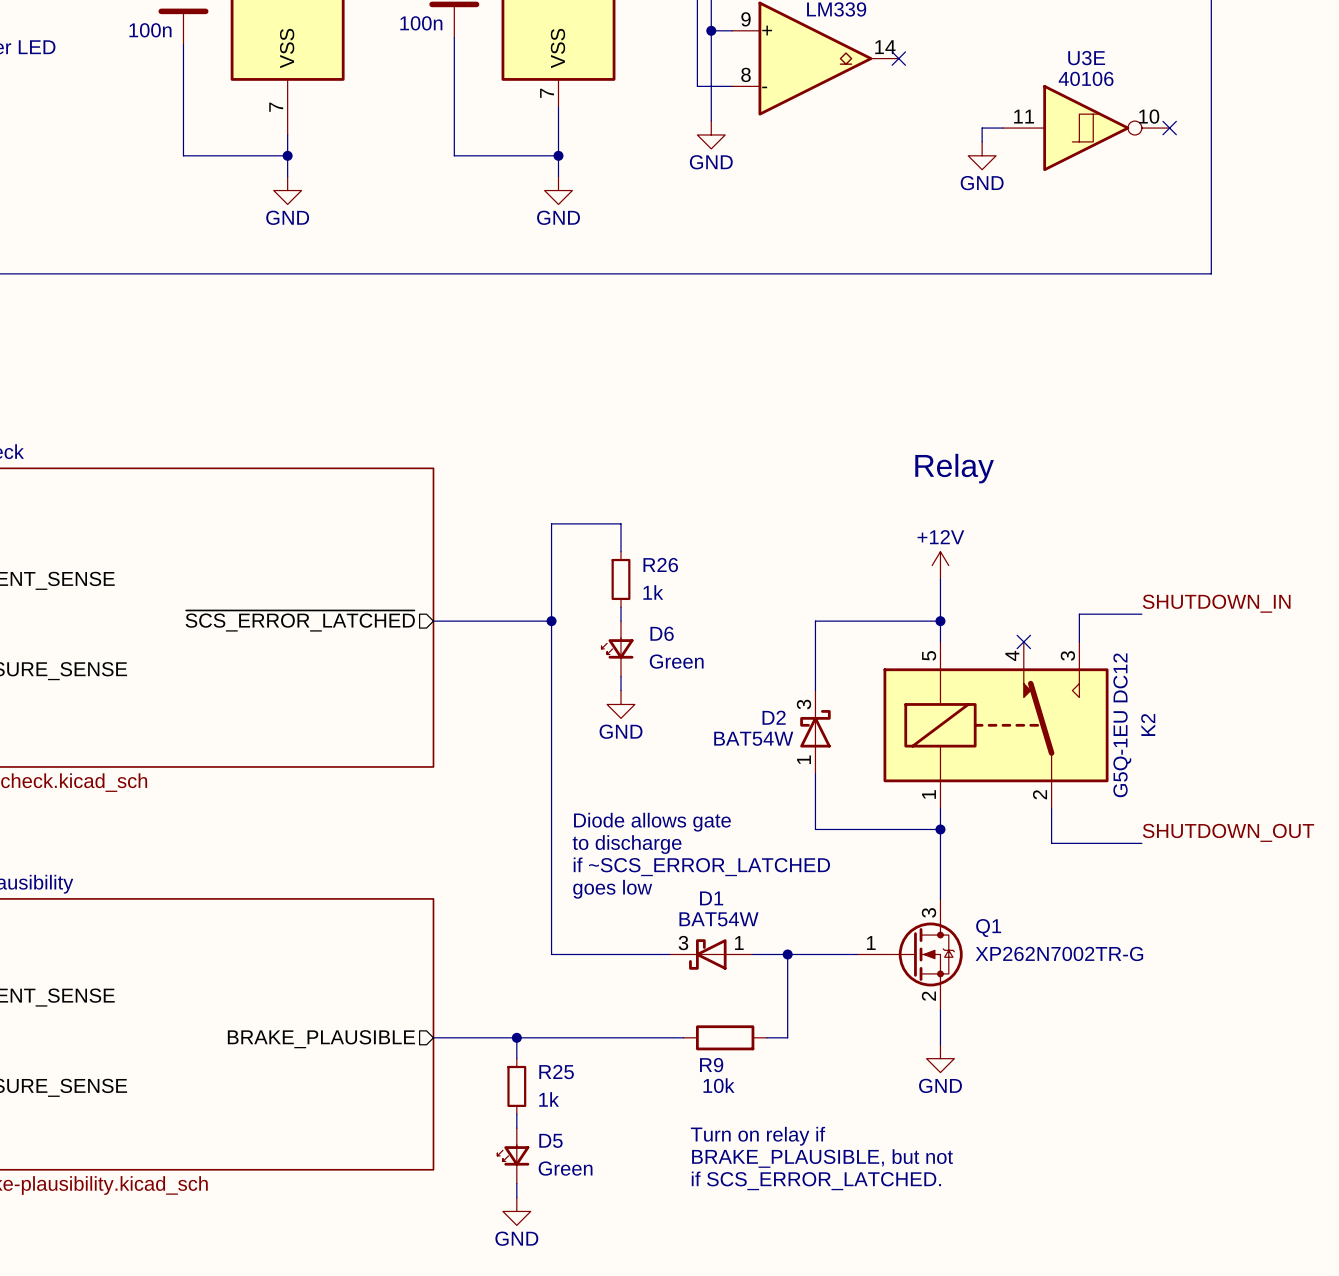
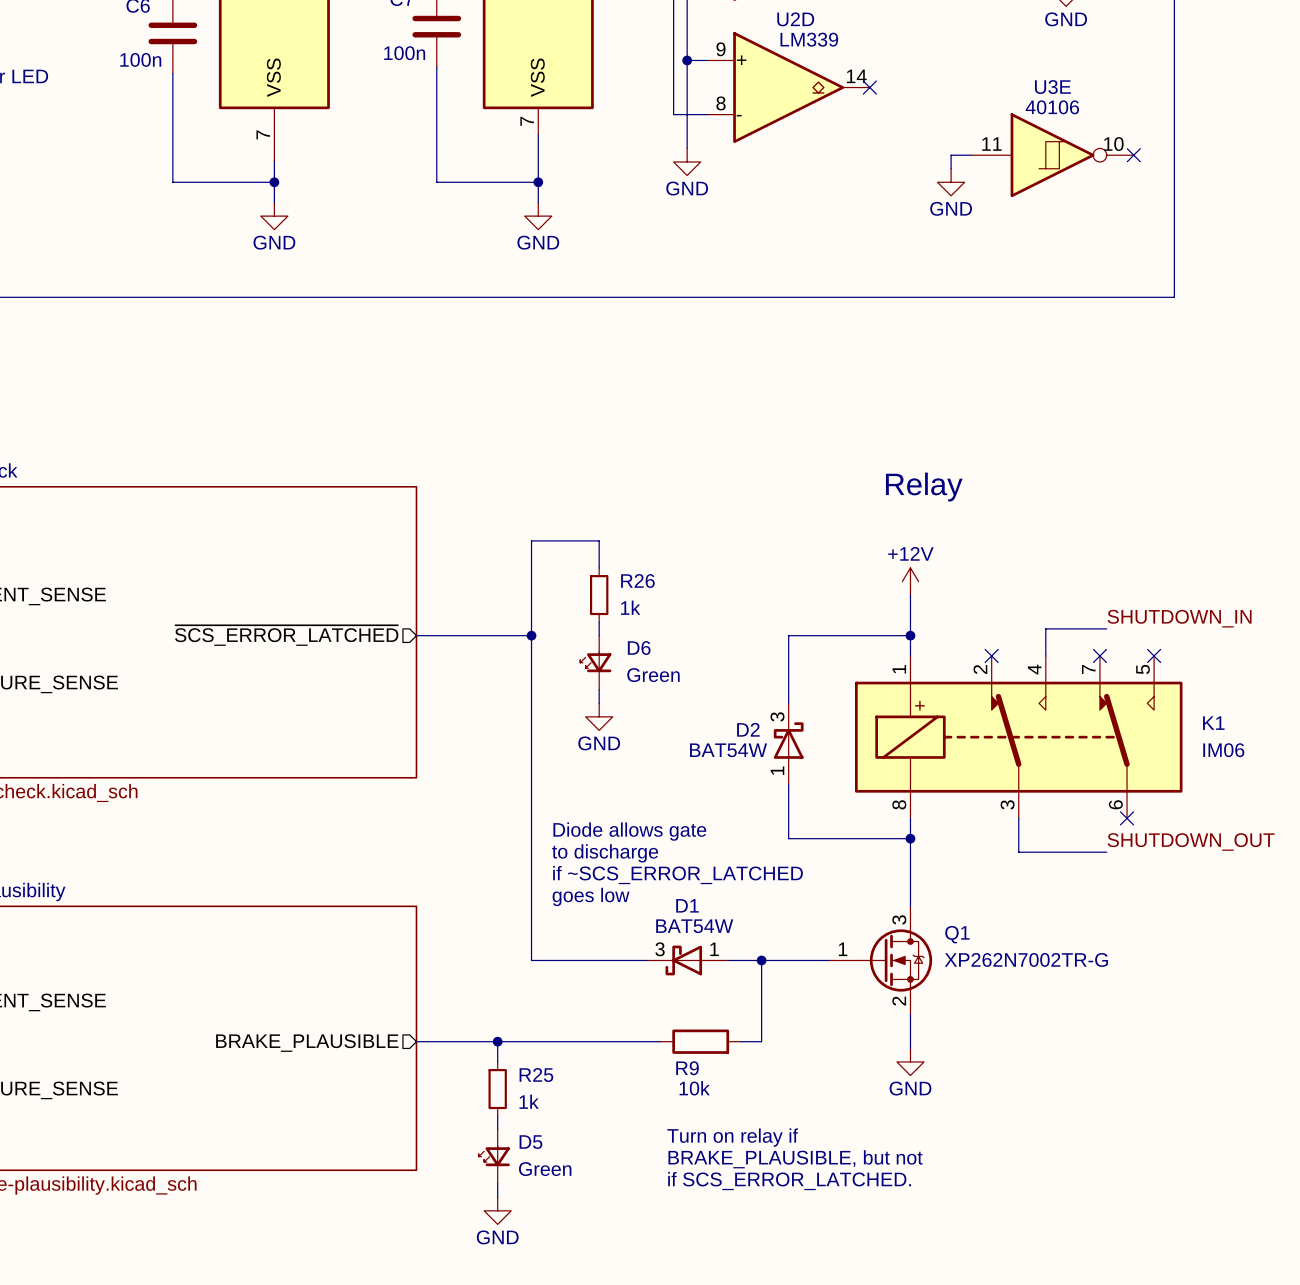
no-connect mark: none -> (1099, 655)
no-connect mark: none -> (1154, 655)
K2: G5Q-1EU DC12 (996, 725) -> none
K1: none -> IM06 (1018, 737)
no-connect mark: none -> (1127, 818)

